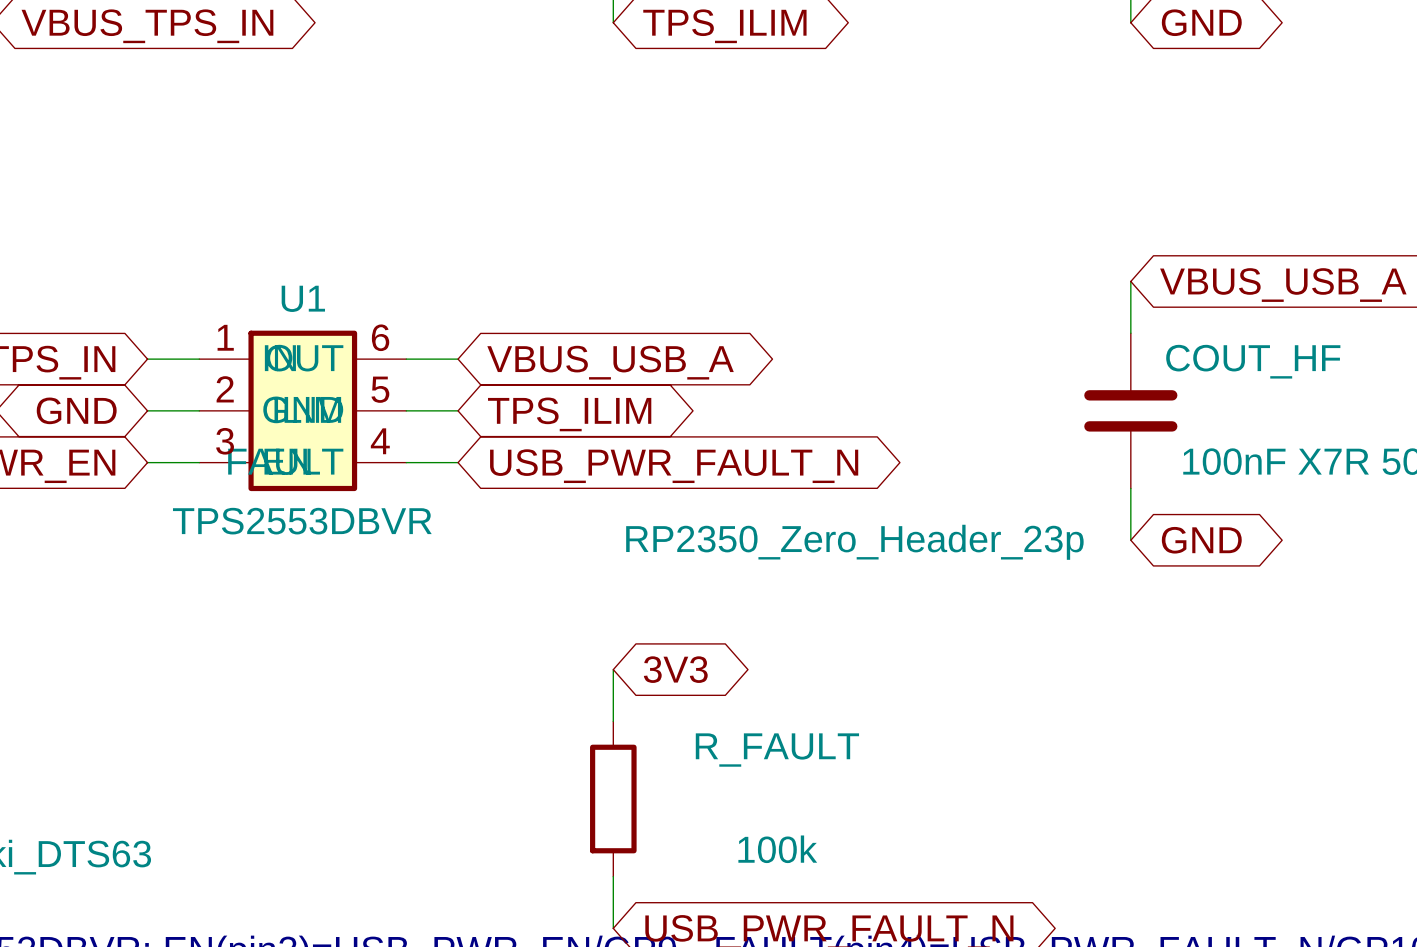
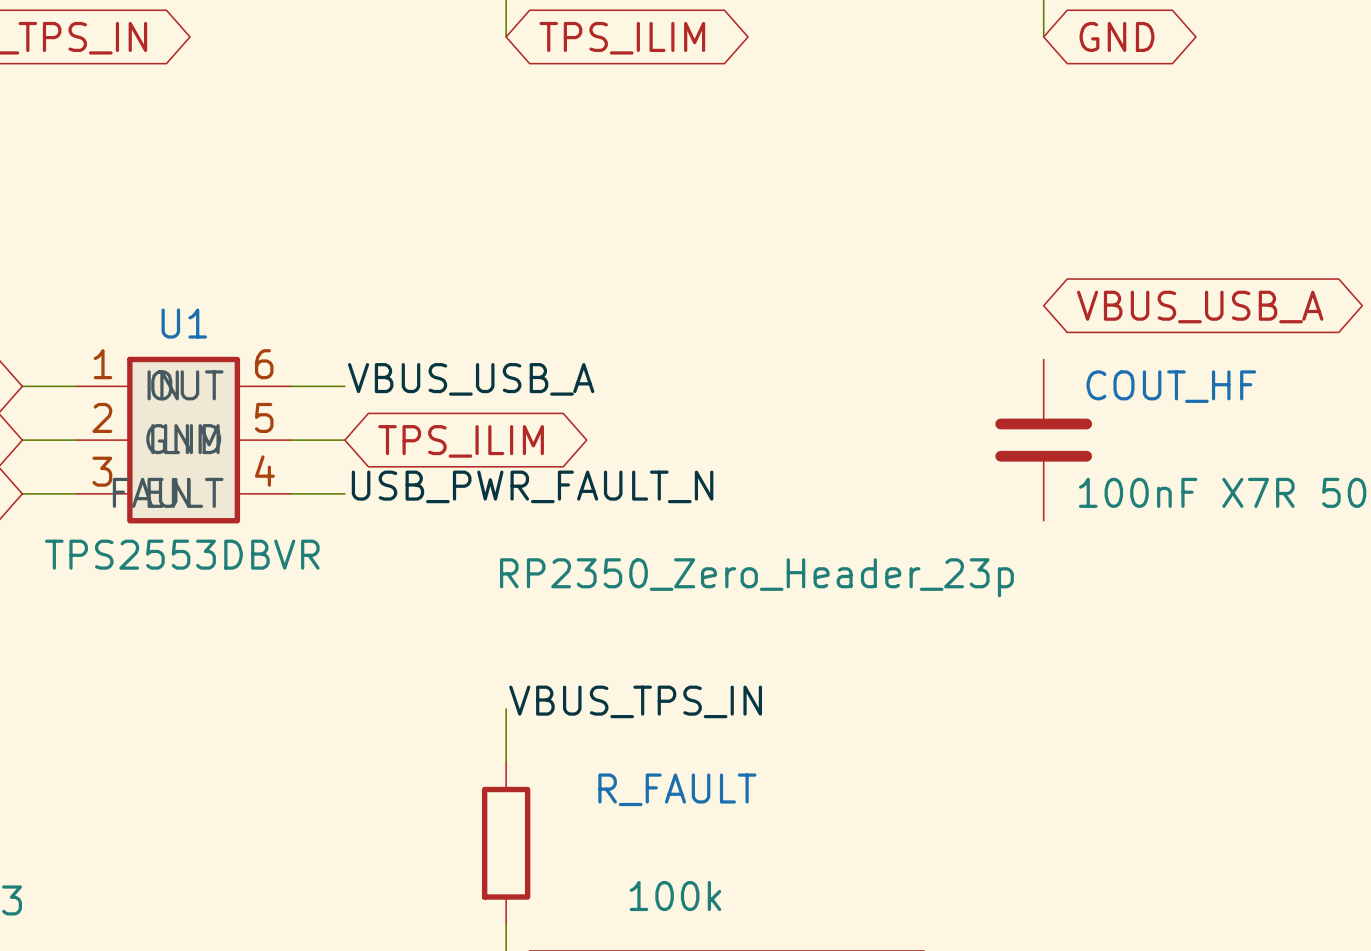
wire: (1130, 281) (1130, 333) -> none
label: none -> VBUS_USB_A (471, 379)
global label: VBUS_USB_A (610, 362) -> none
label: none -> USB_PWR_FAULT_N (532, 486)
global label: USB_PWR_FAULT_N (674, 466) -> none
wire: (1130, 488) (1130, 540) -> none
global label: GND (1201, 540) -> none
label: none -> VBUS_TPS_IN (635, 701)
global label: 3V3 (675, 669) -> none

